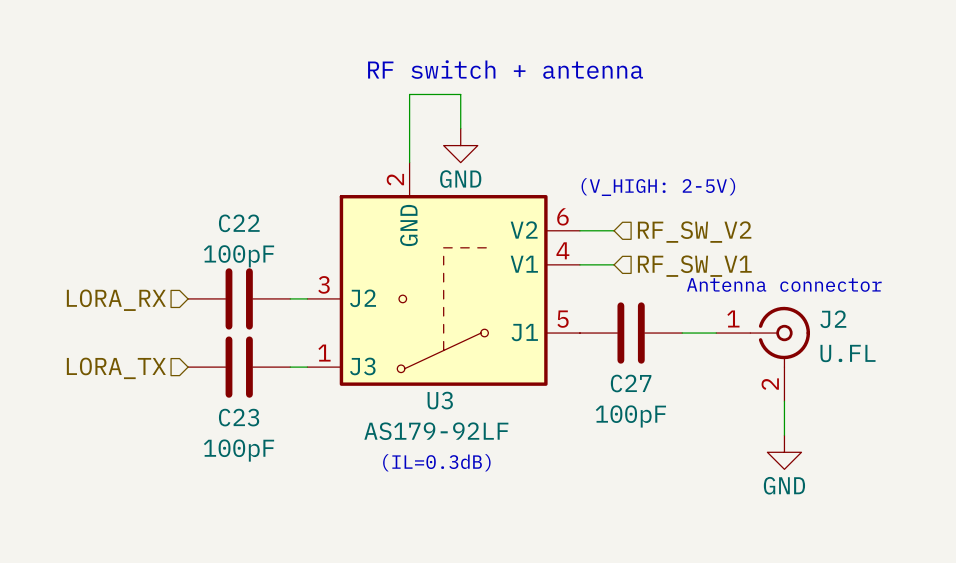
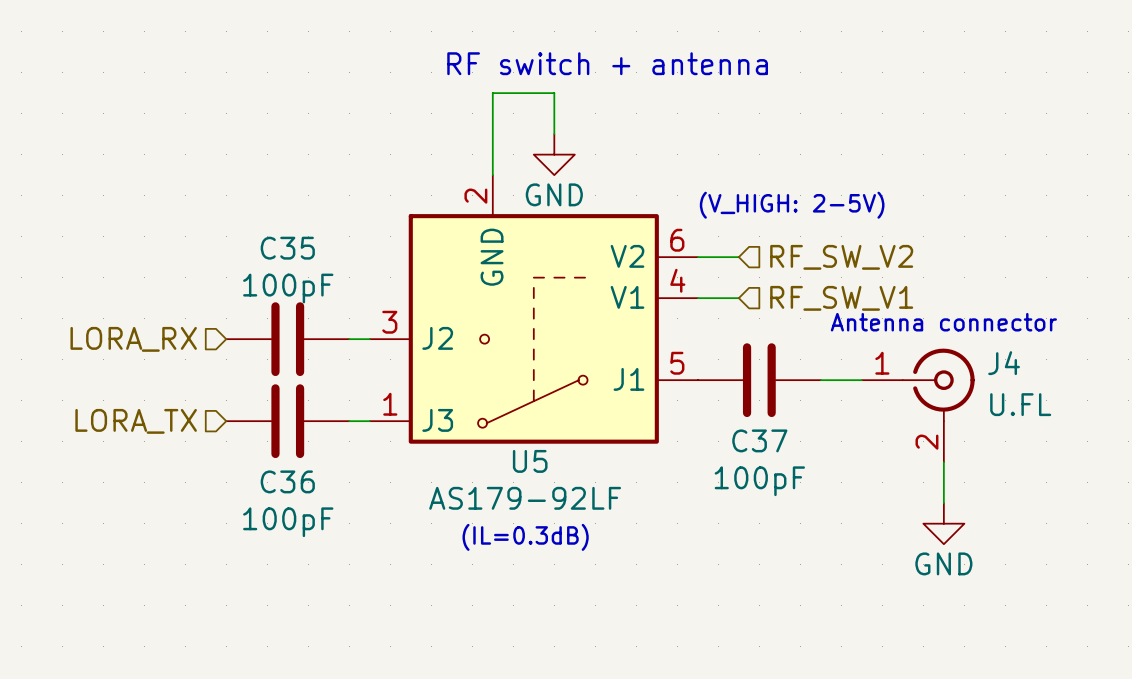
C22 name: C22 (239, 223) -> C35 (287, 248)
J2 name: J2 (833, 319) -> J4 (1004, 363)
C27 name: C27 (631, 383) -> C37 (759, 440)
U3 name: U3 (440, 400) -> U5 (530, 461)
C23 name: C23 (239, 417) -> C36 (287, 481)

